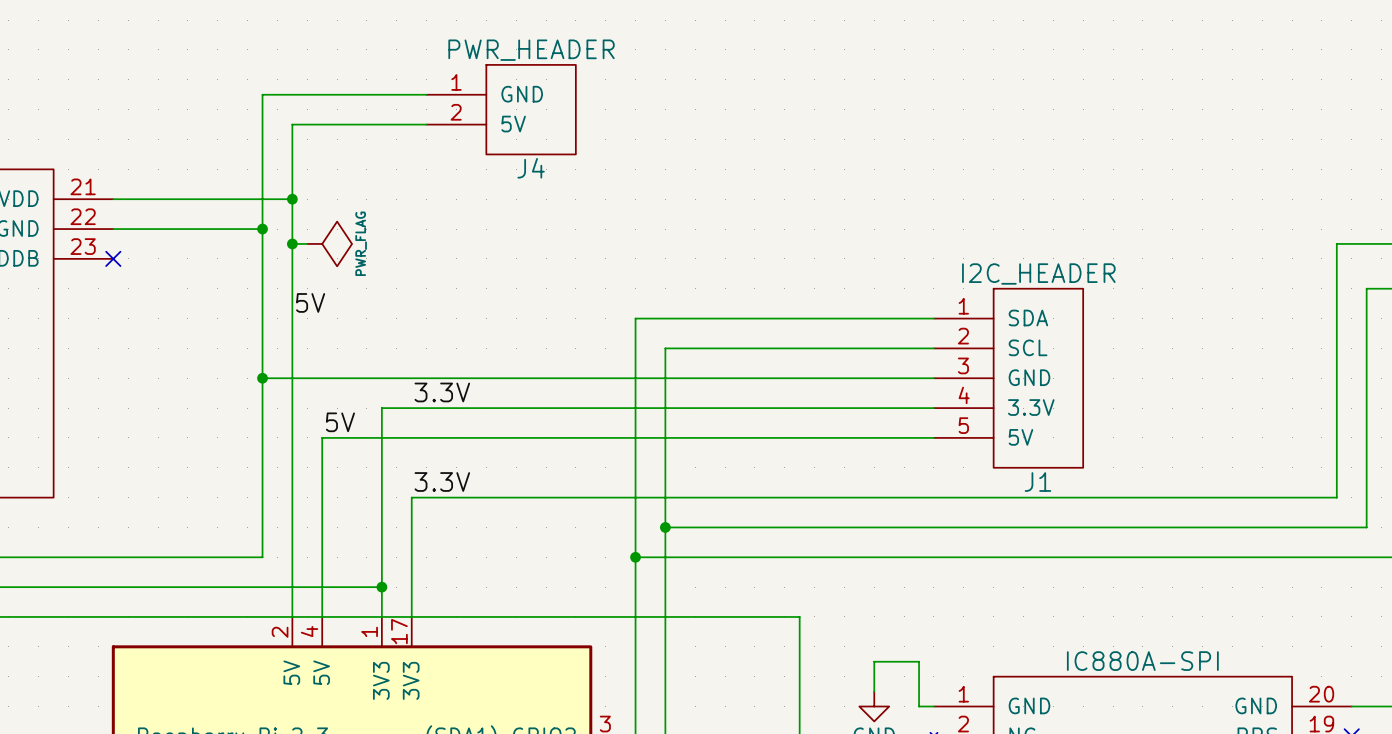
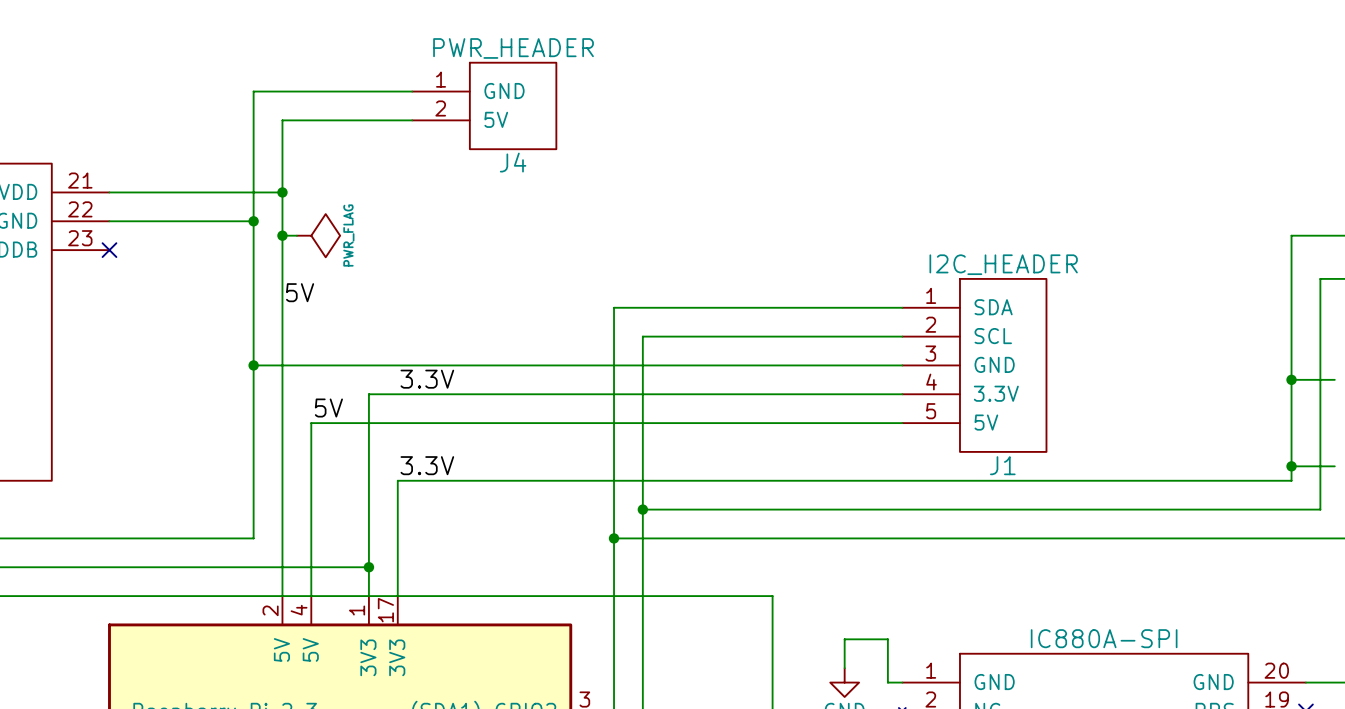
wire: none -> (1291, 379) (1334, 379)
junction: none -> (1291, 379)
wire: none -> (1291, 466) (1334, 466)
junction: none -> (1291, 466)

